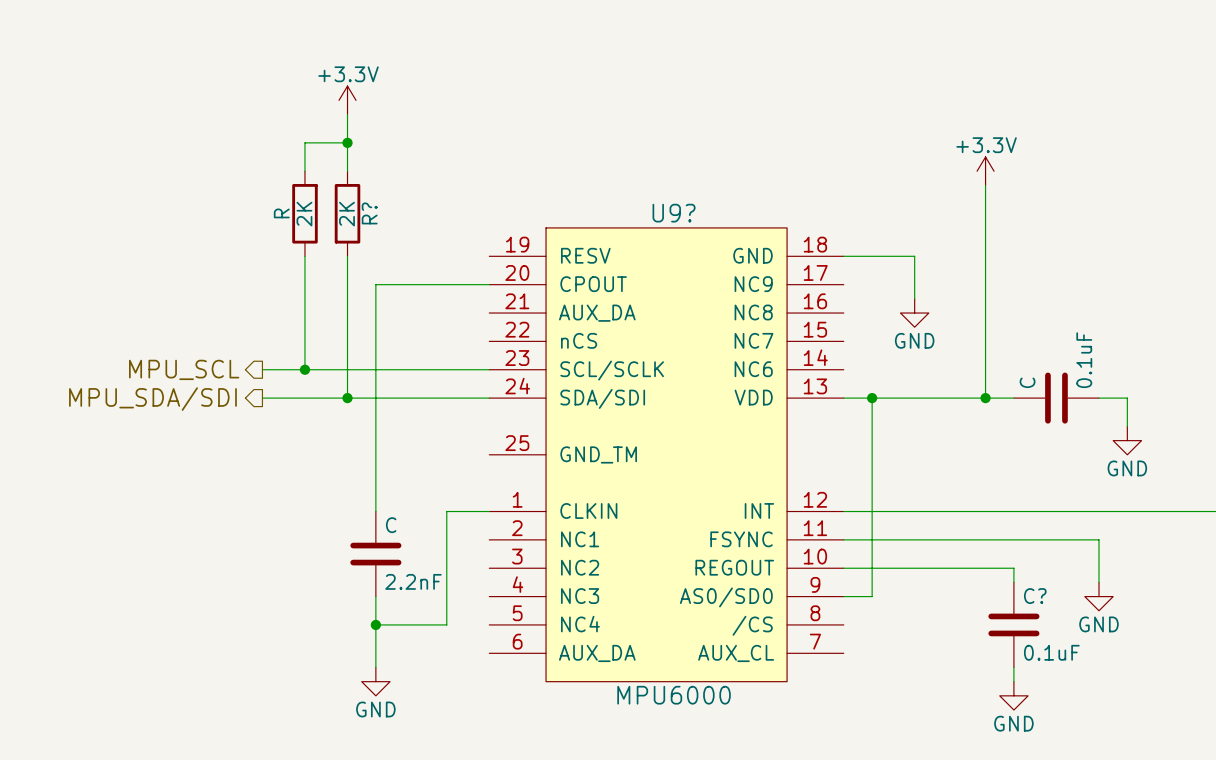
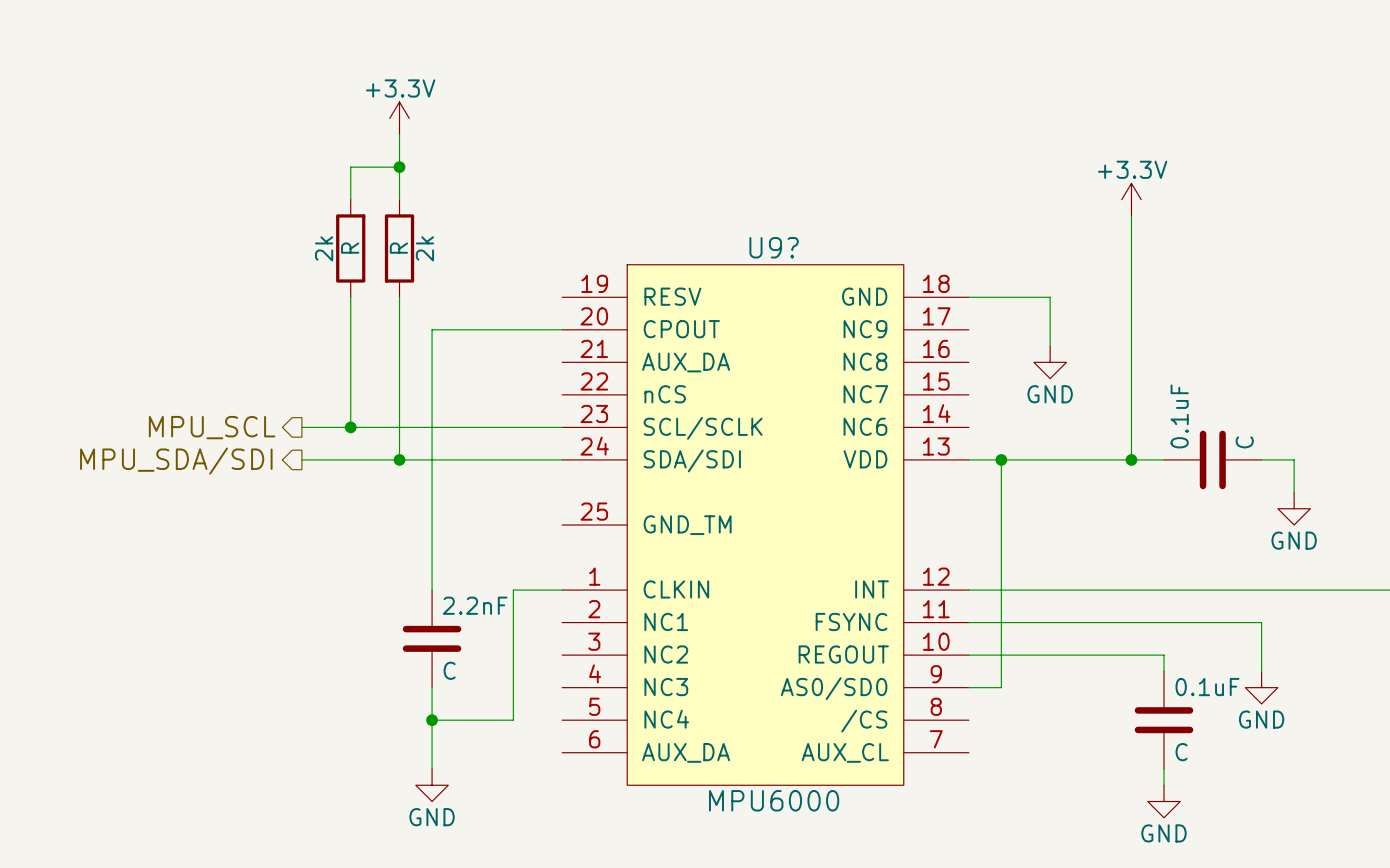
R name: R (281, 213) -> 2k (324, 248)
R? name: R? (369, 213) -> 2k (424, 248)
R value: 2K (304, 214) -> R (350, 248)
R? value: 2K (346, 214) -> R (398, 248)
C value: 0.1uF (1084, 360) -> C (1244, 442)
C name: C (1027, 382) -> 0.1uF (1179, 416)
C name: C (391, 525) -> 2.2nF (475, 605)
C value: 2.2nF (413, 581) -> C (449, 670)
C? name: C? (1035, 596) -> 0.1uF (1207, 687)
C? value: 0.1uF (1051, 652) -> C (1181, 752)

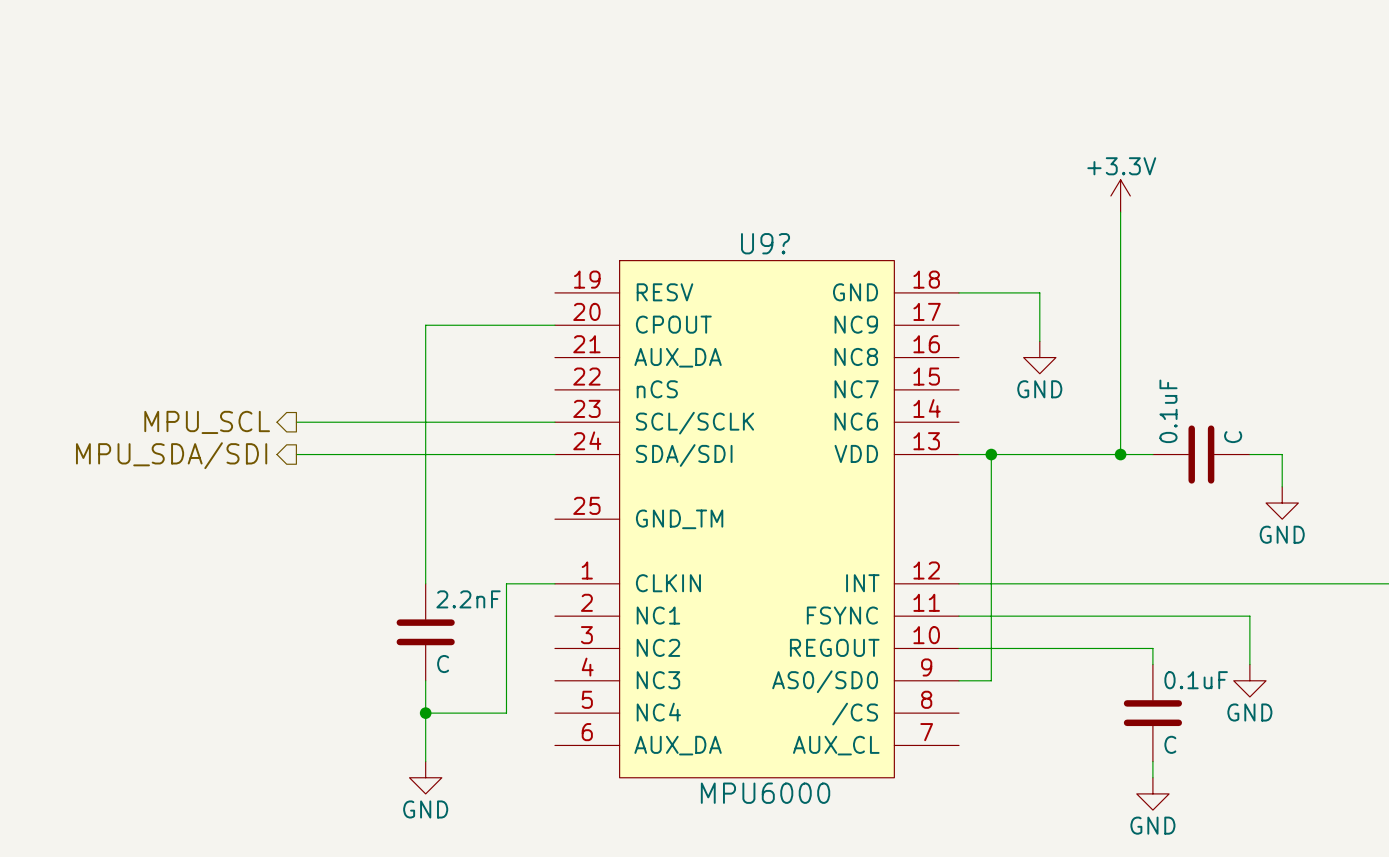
power symbol: +3.3V (399, 118) -> none
wire: (399, 134) (399, 199) -> none
wire: (399, 167) (350, 167) (350, 199) -> none
junction: (399, 167) -> none
2k: R (350, 248) -> none
2k: R (399, 248) -> none
wire: (350, 297) (350, 427) -> none
wire: (399, 297) (399, 459) -> none
junction: (350, 427) -> none
junction: (399, 459) -> none

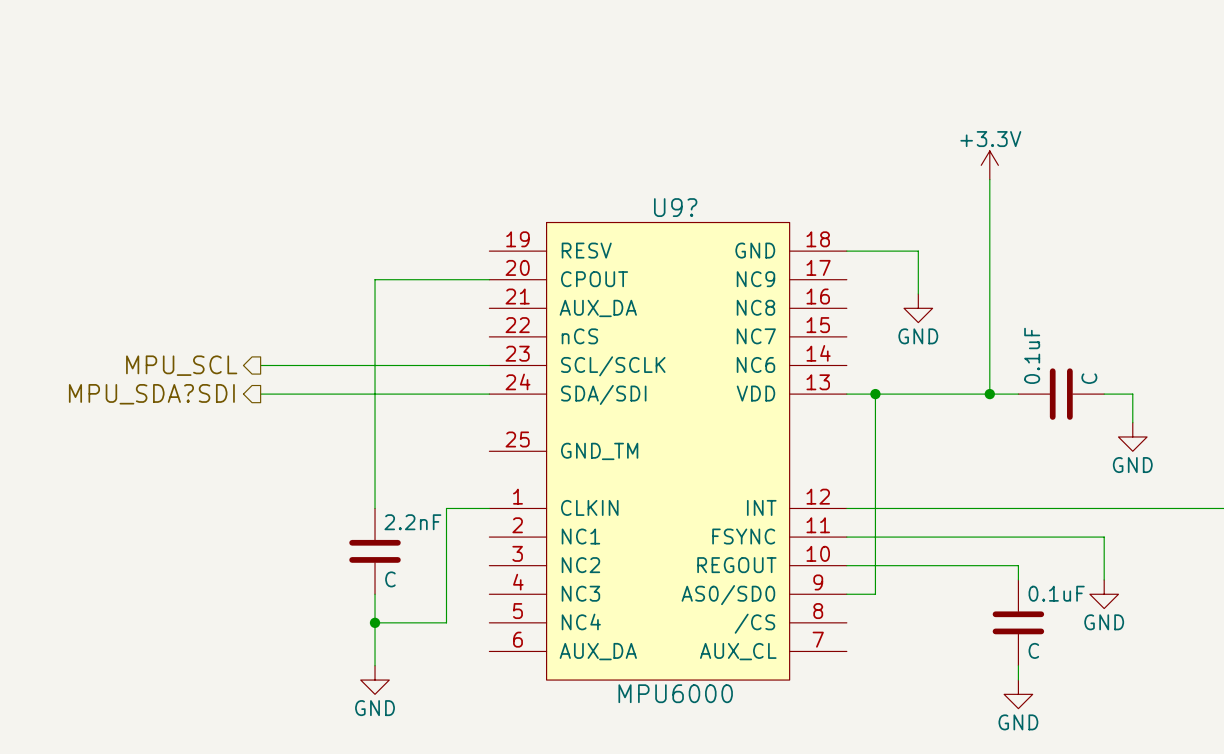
hierarchical label: MPU_SDA/SDI (171, 455) -> MPU_SDA?SDI (151, 394)

